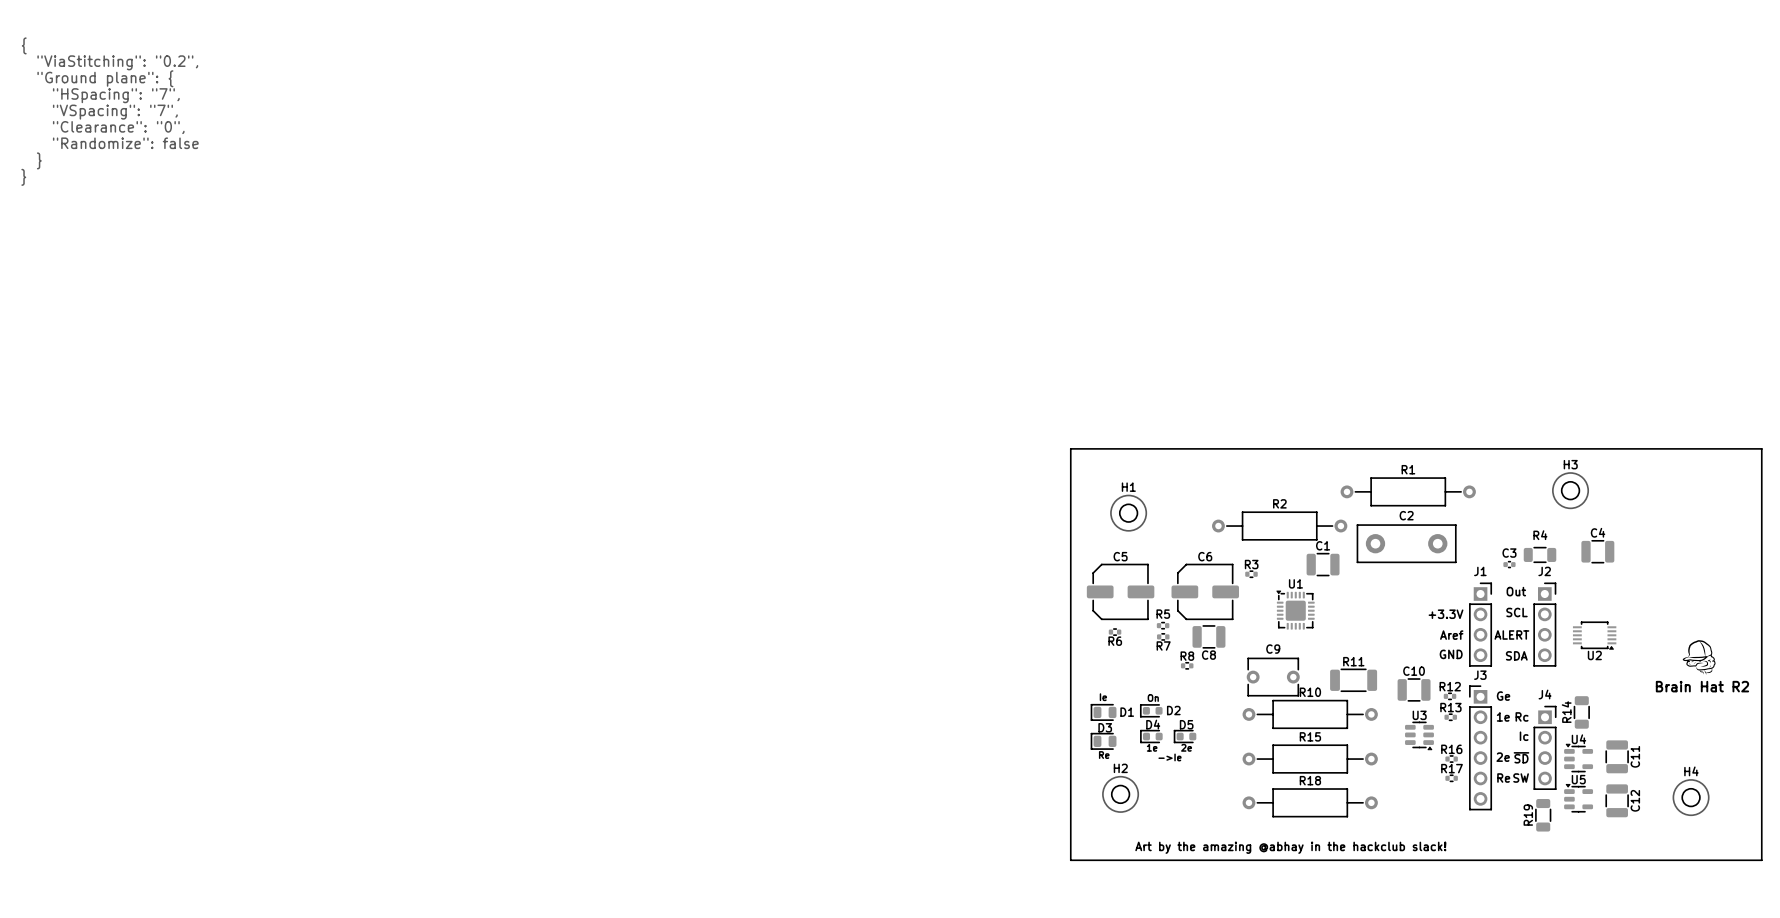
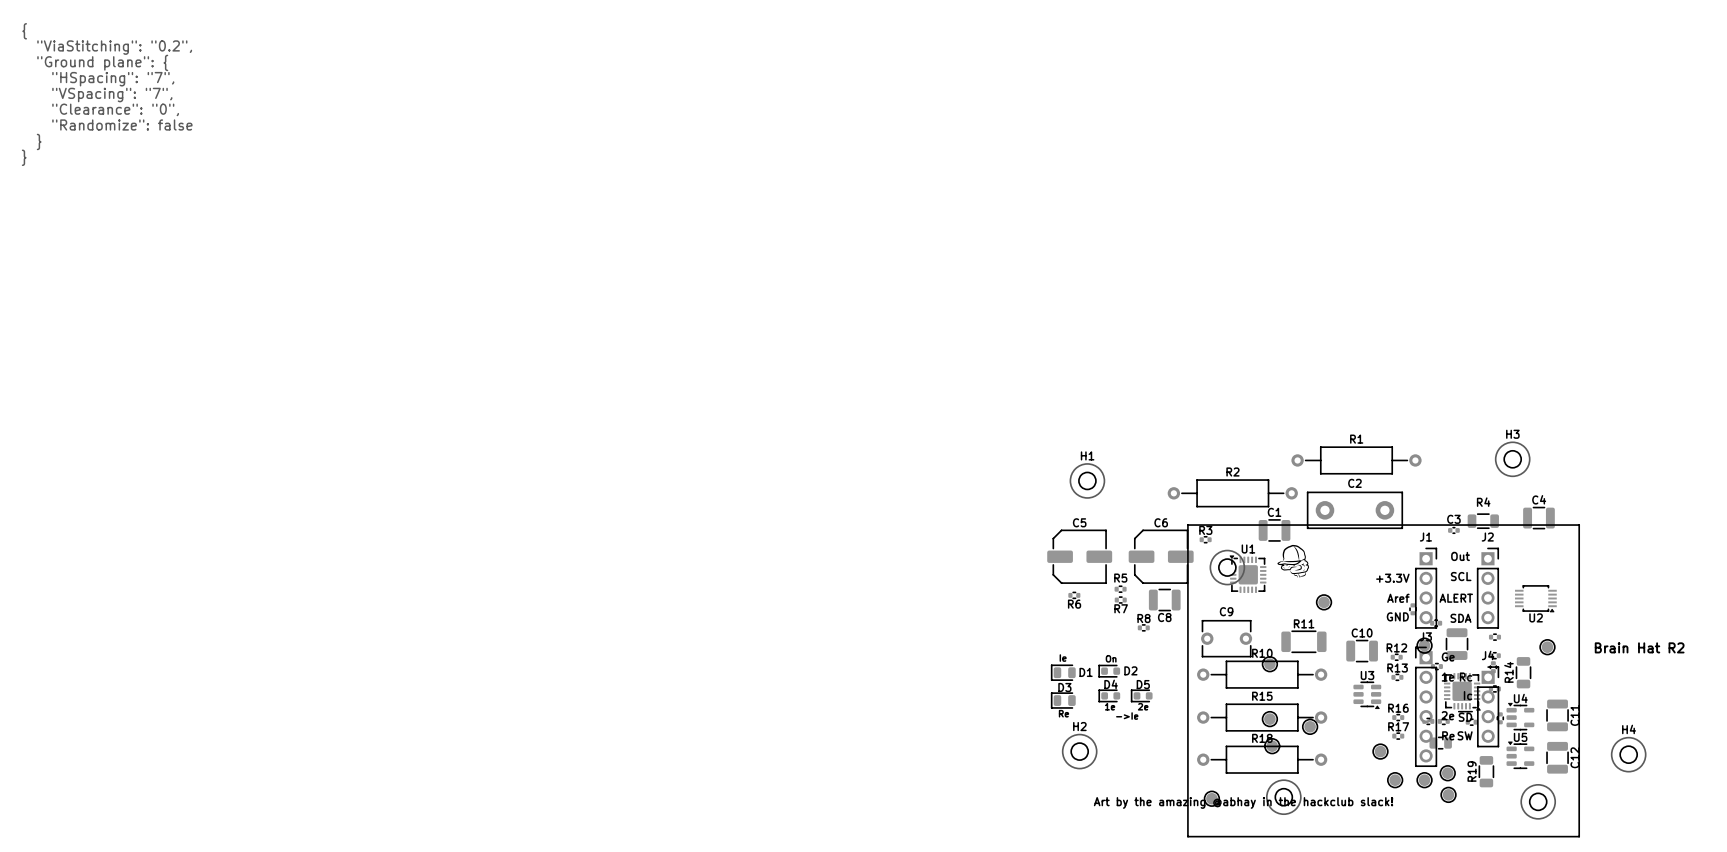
board edge: (1070, 448) (1761, 448) (1761, 860) (1070, 860) (1070, 448) -> none
board edge: none -> (1187, 525) (1579, 525) (1579, 836) (1187, 836) (1187, 525)
drawing: none -> [1277, 544, 1309, 578]
part: none -> (1227, 567)
part: none -> (1324, 602)
drawing: [1682, 640, 1716, 675] -> none
part: none -> (1412, 609)
part: none -> (1436, 623)
part: none -> (1494, 637)
part: none -> (1457, 644)
part: none -> (1424, 645)
part: none -> (1547, 647)
part: none -> (1494, 655)
part: none -> (1269, 664)
part: none -> (1436, 666)
part: none -> (1493, 667)
part: none -> (1494, 688)
part: none -> (1462, 691)
part: none -> (1500, 718)
part: none -> (1269, 719)
part: none -> (1428, 721)
part: none -> (1443, 721)
part: none -> (1471, 722)
part: none -> (1310, 726)
part: none -> (1440, 743)
part: none -> (1272, 746)
part: none -> (1380, 751)
part: none -> (1447, 773)
part: none -> (1395, 780)
part: none -> (1424, 780)
part: none -> (1448, 794)
part: none -> (1283, 797)
part: none -> (1211, 798)
part: none -> (1538, 801)

